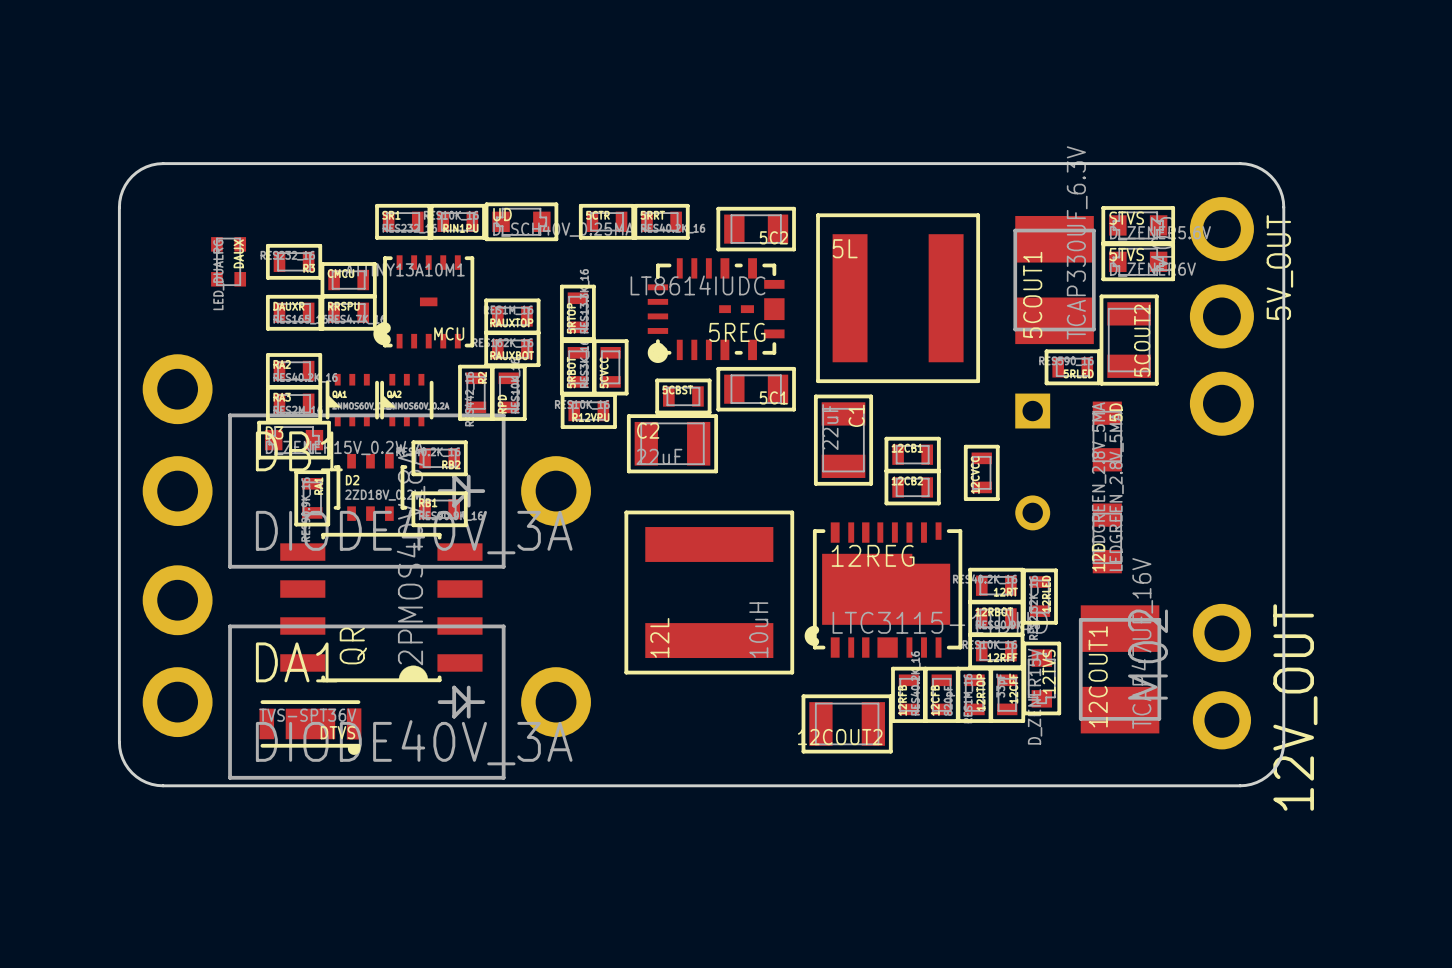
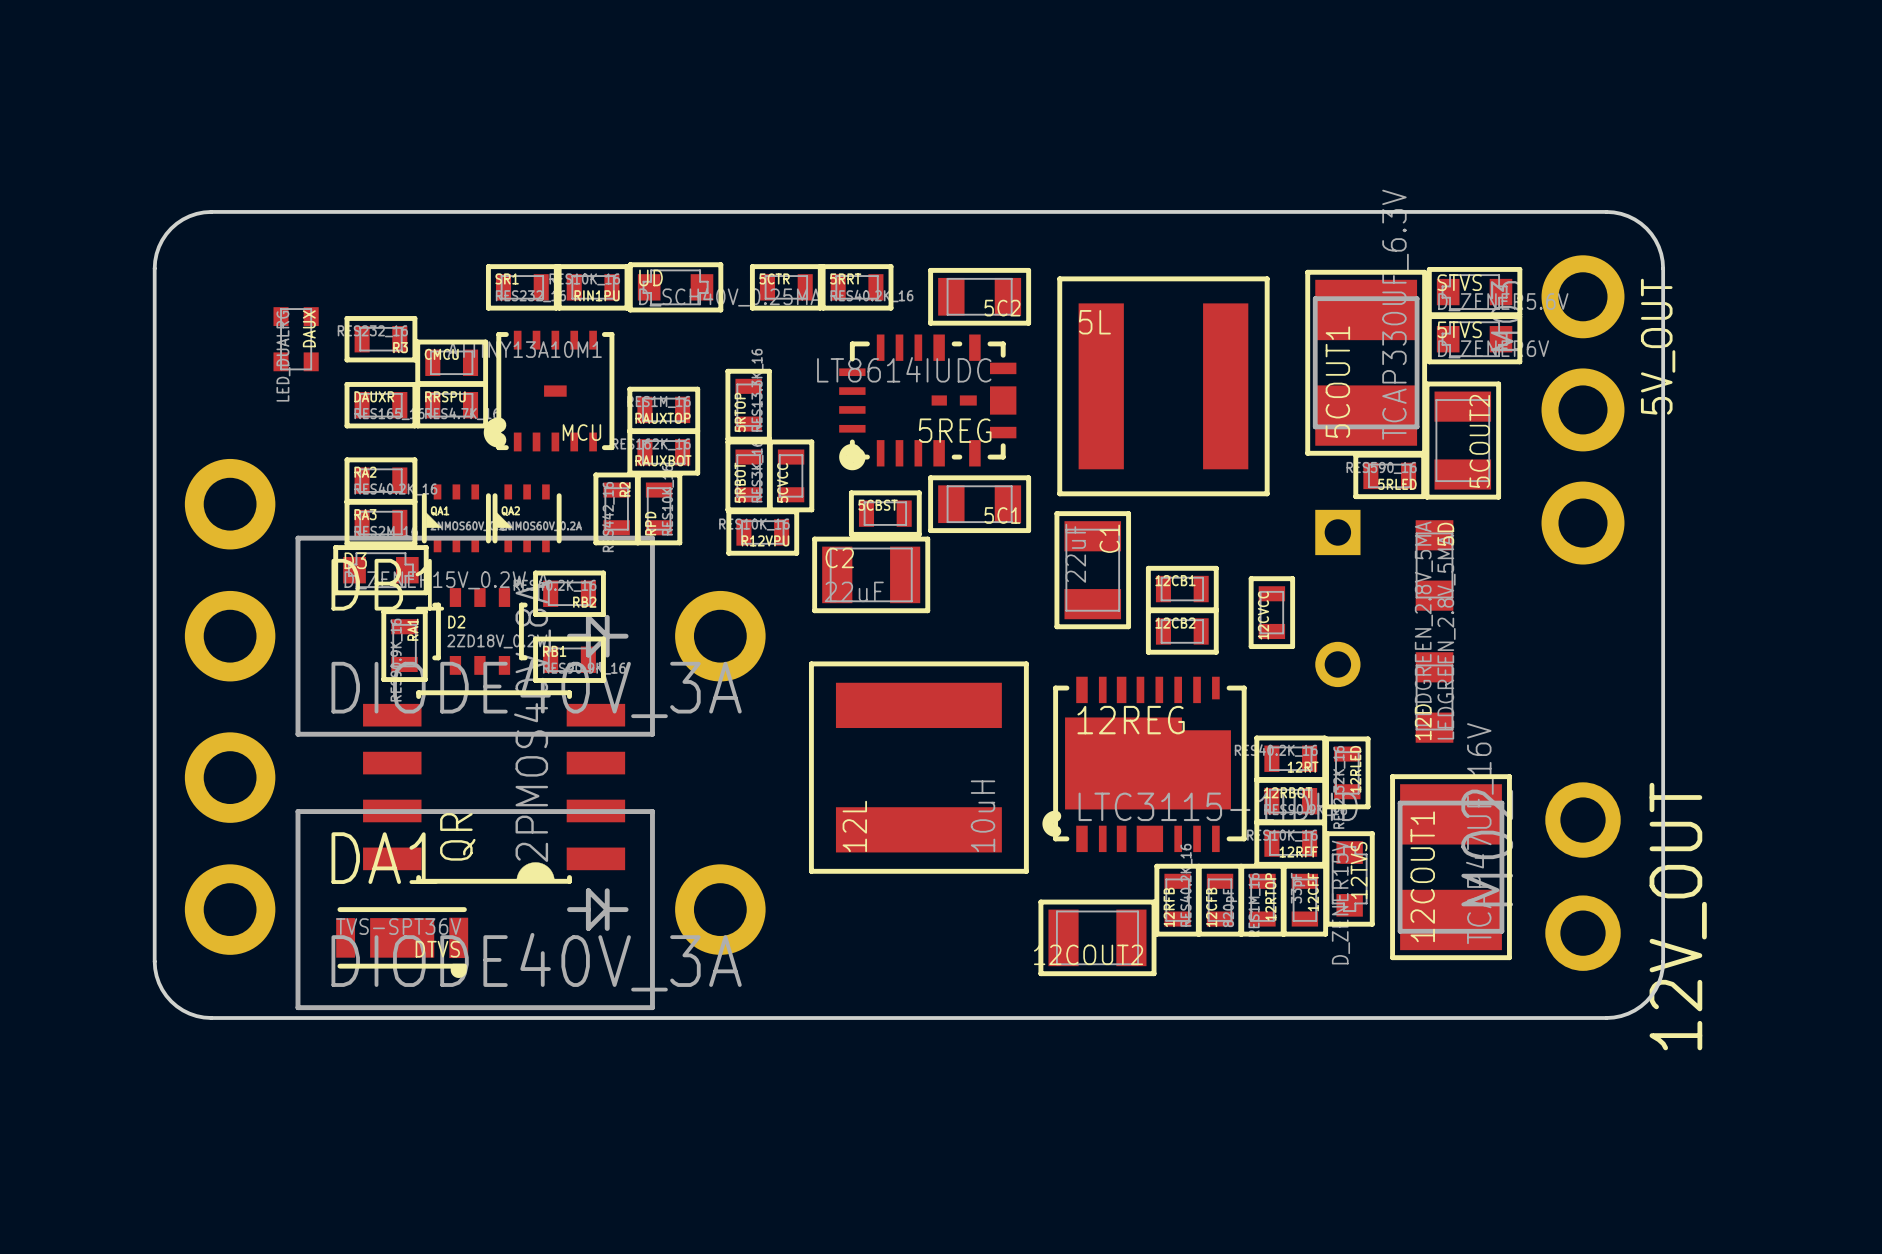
5COUT1 footprint: [1013, 215, 1096, 345] -> [1305, 269, 1428, 456]
12COUT1 footprint: [1078, 605, 1162, 734] -> [1390, 774, 1512, 961]

